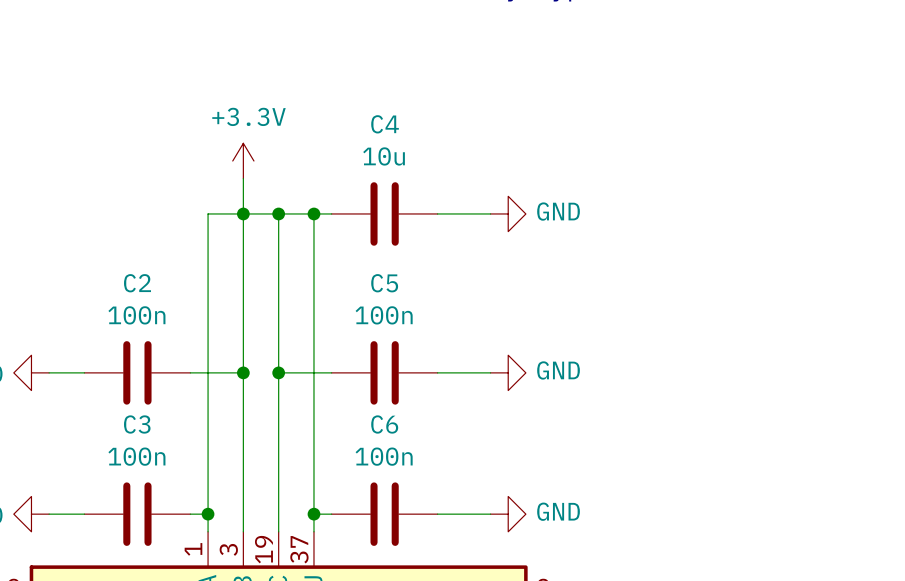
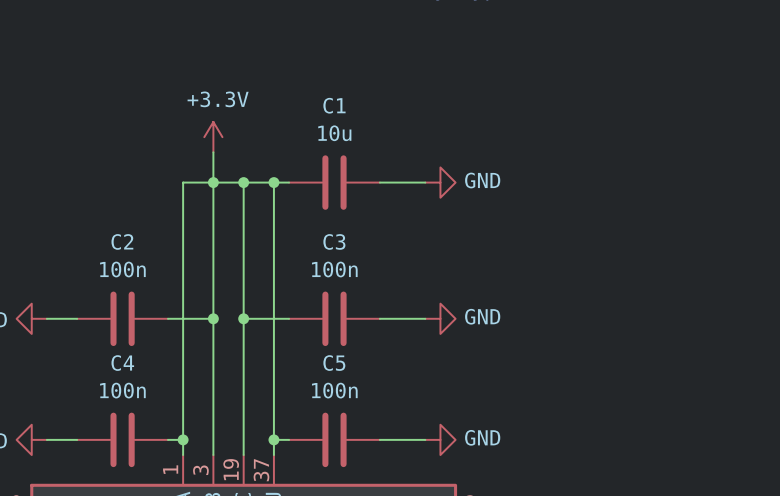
C4 name: C4 (385, 124) -> C1 (334, 105)
C5 name: C5 (384, 283) -> C3 (334, 241)
C3 name: C3 (137, 424) -> C4 (122, 363)
C6 name: C6 (384, 424) -> C5 (334, 363)

